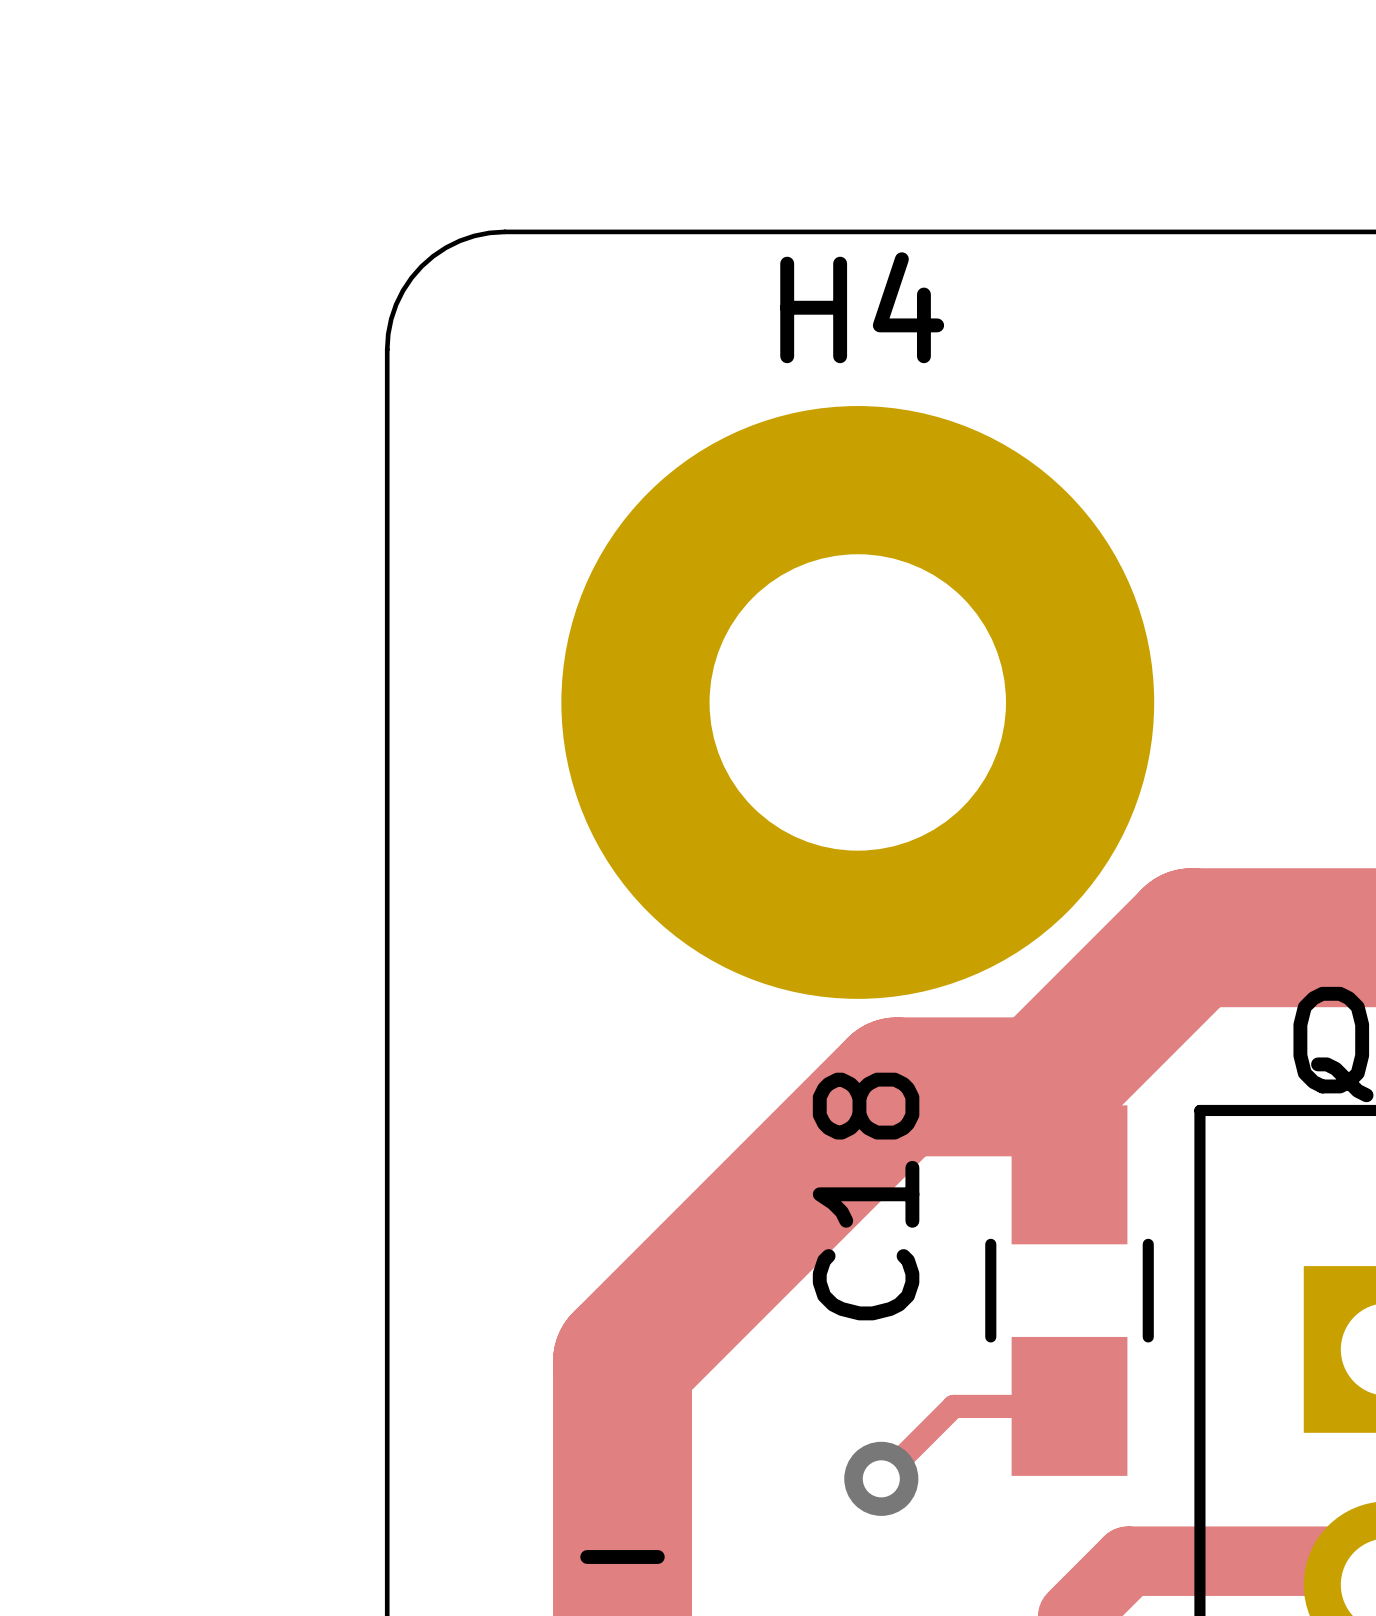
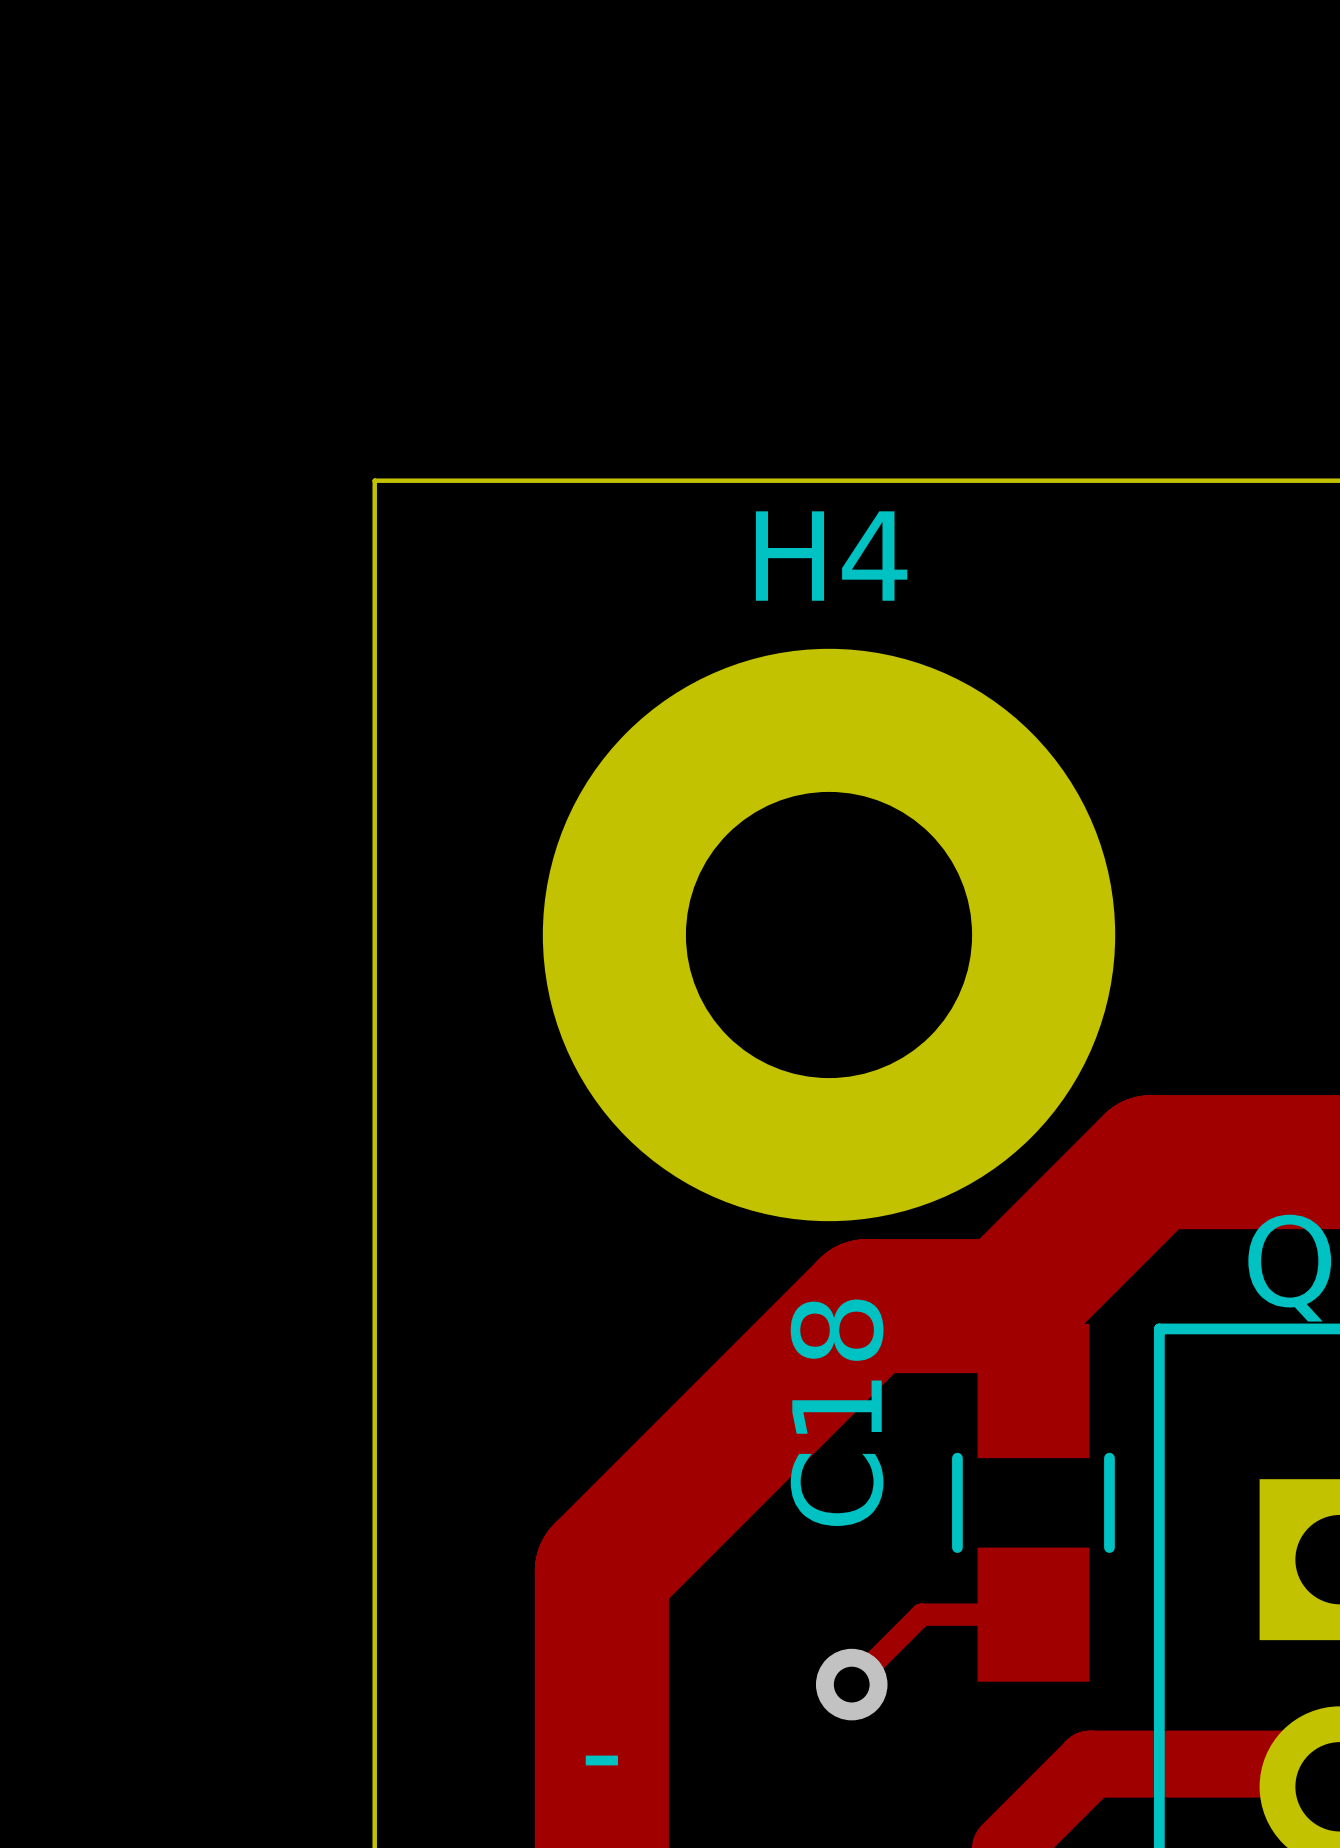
board edge: (504, 231) (489, 232) (459, 240) (446, 247) (421, 266) (402, 290) (396, 304) (388, 334) (387, 349) -> (488, 480) (374, 480) (374, 594)

